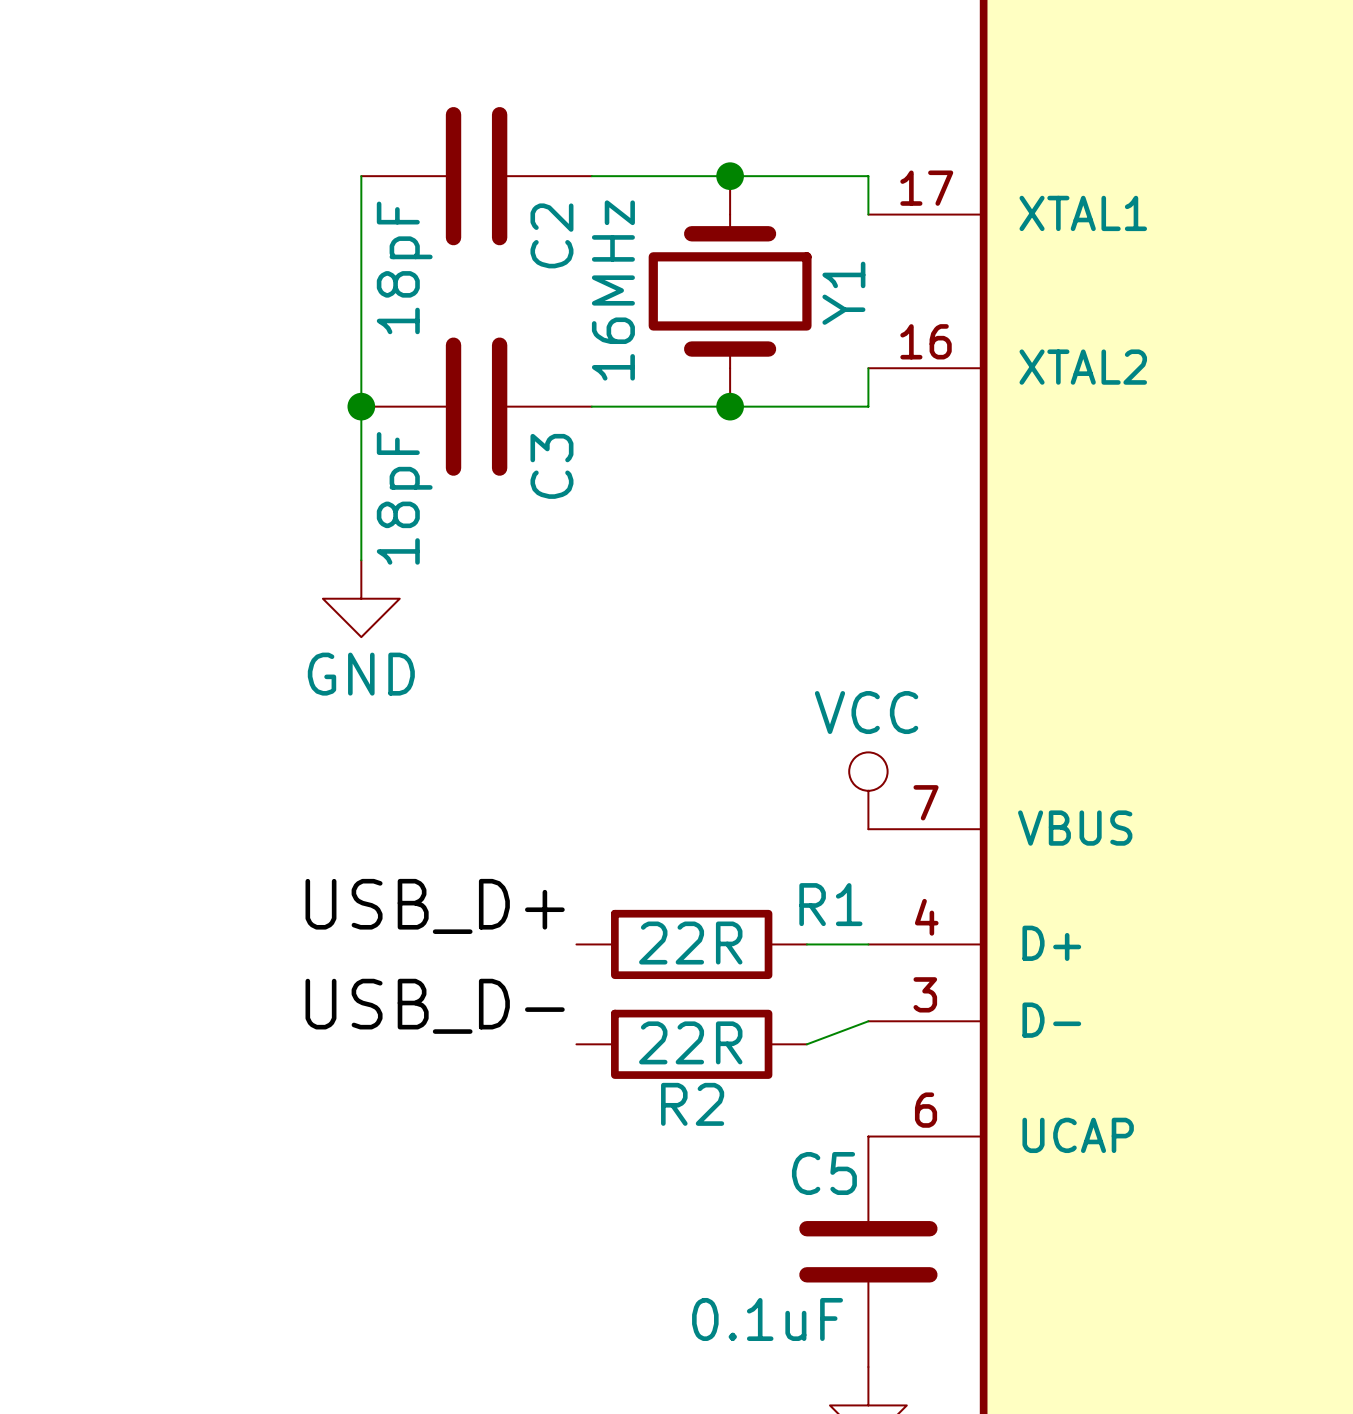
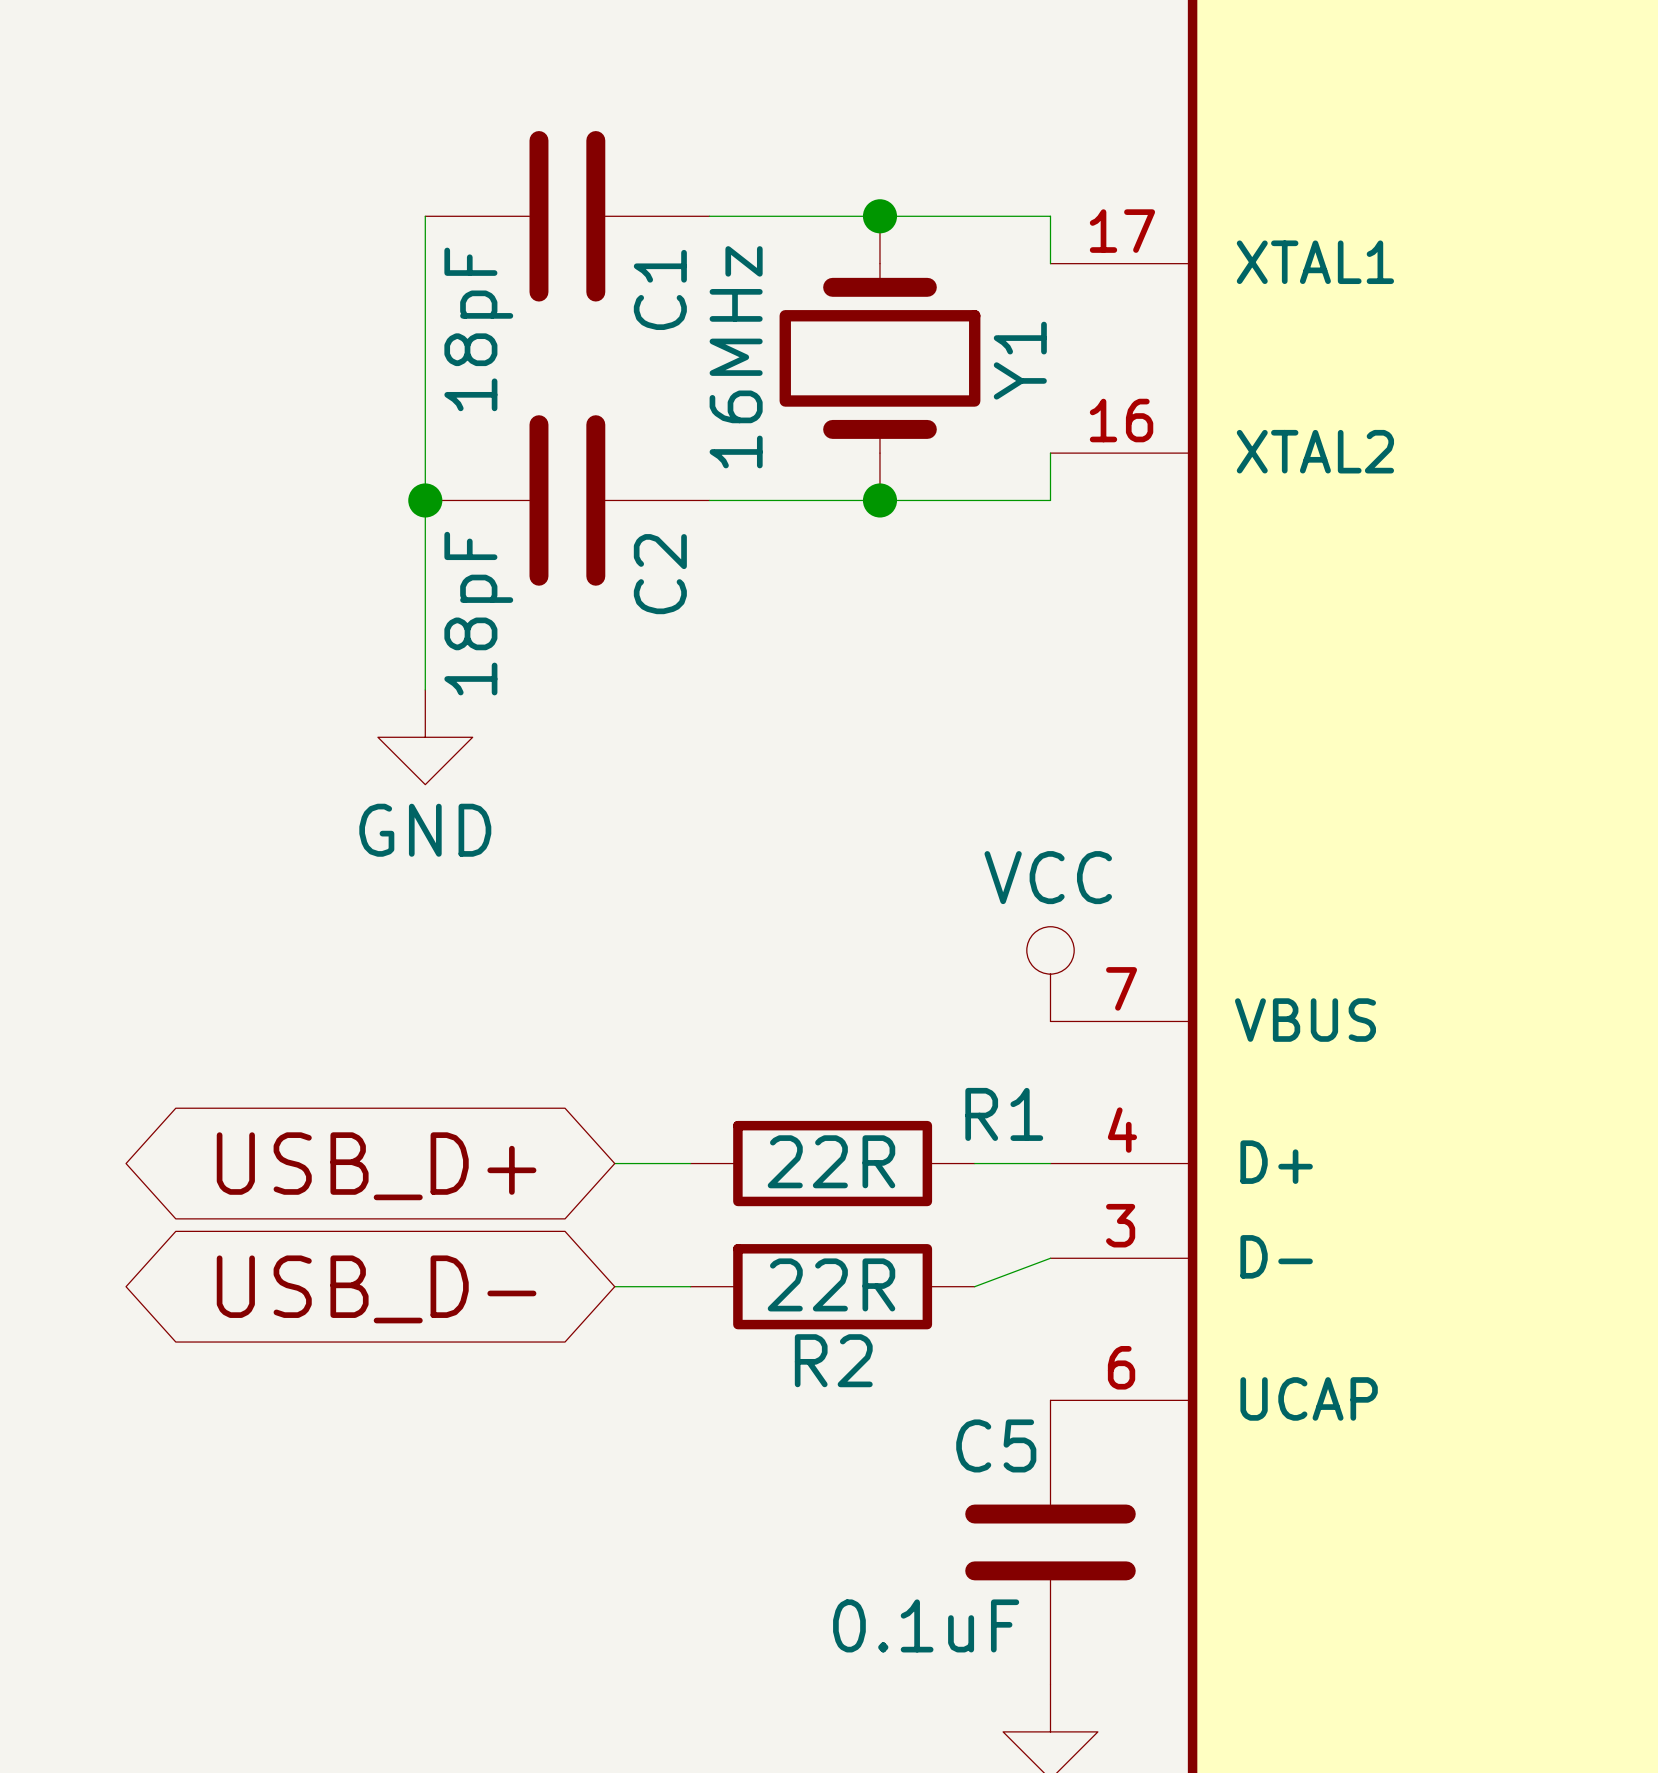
C2 name: C2 (551, 235) -> C1 (660, 289)
C3 name: C3 (551, 466) -> C2 (660, 574)
label: USB_D+ (435, 906) -> none
wire: none -> (614, 1163) (690, 1163)
global label: none -> USB_D+ (376, 1166)
label: USB_D- (435, 1006) -> none
wire: none -> (614, 1286) (690, 1286)
global label: none -> USB_D- (376, 1289)

